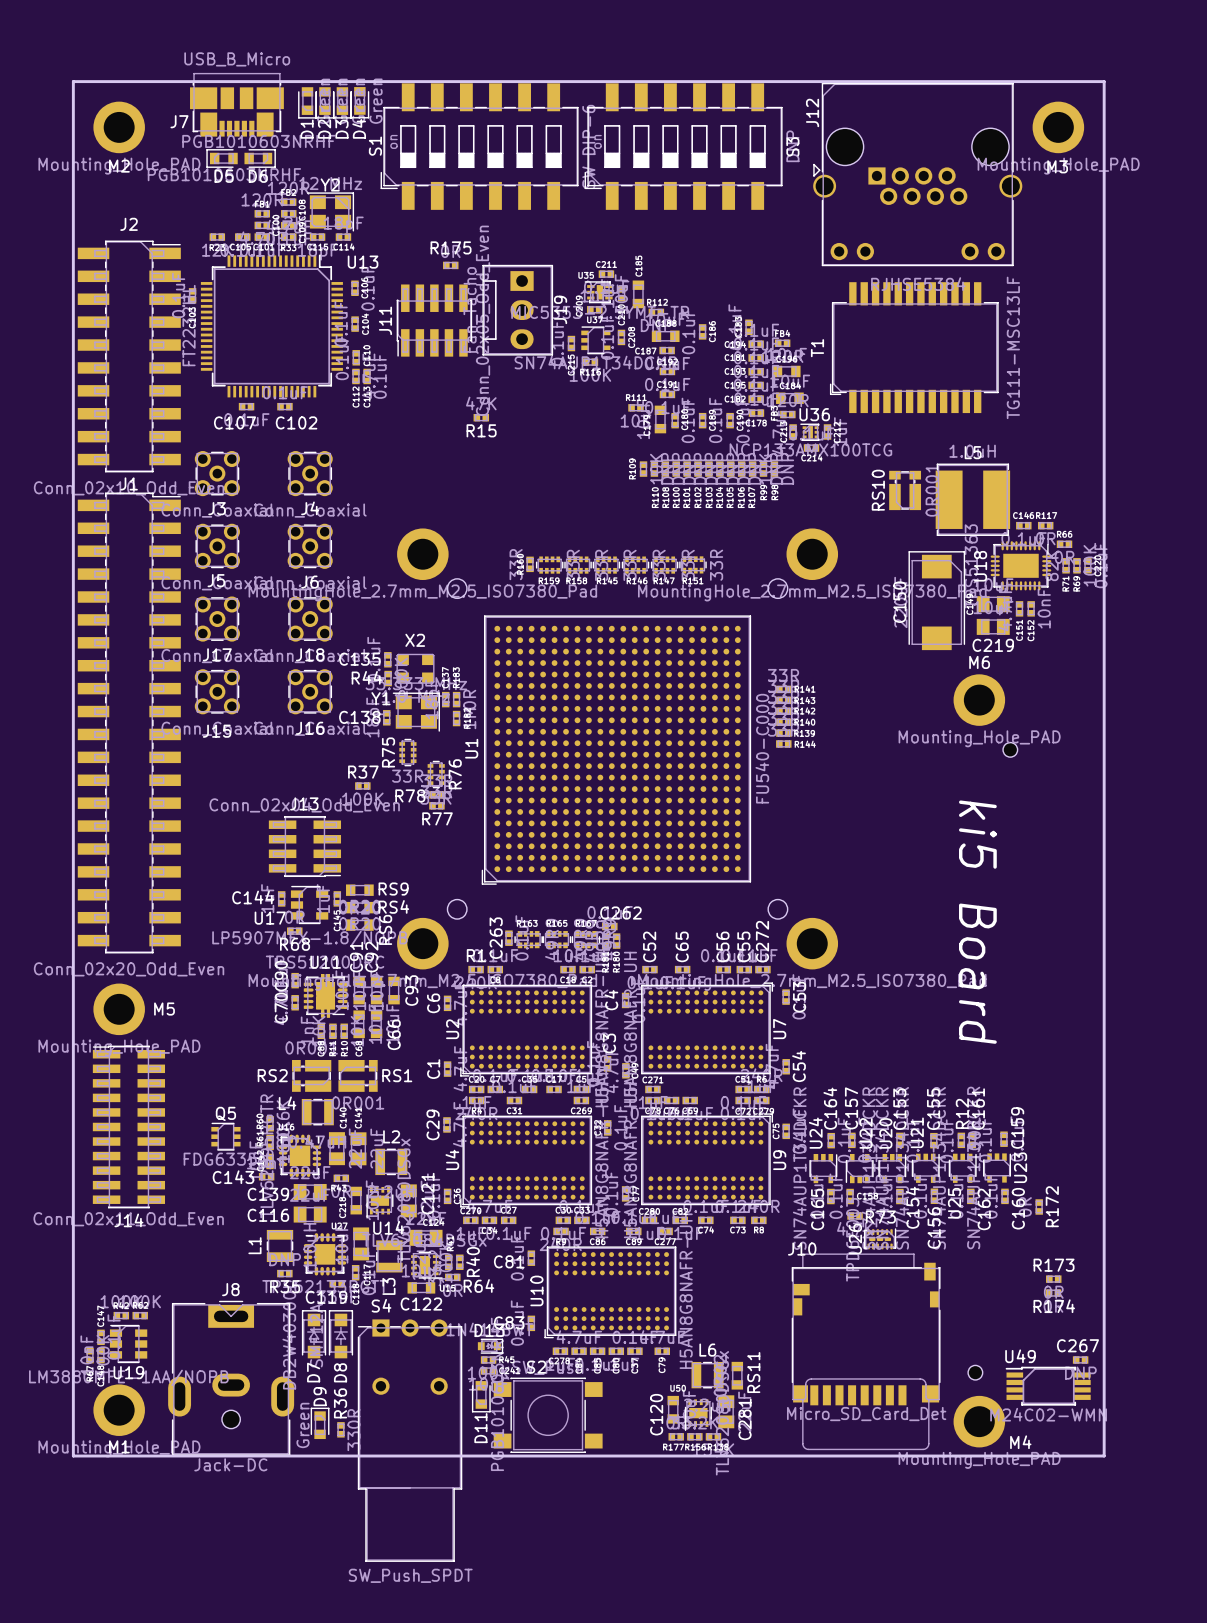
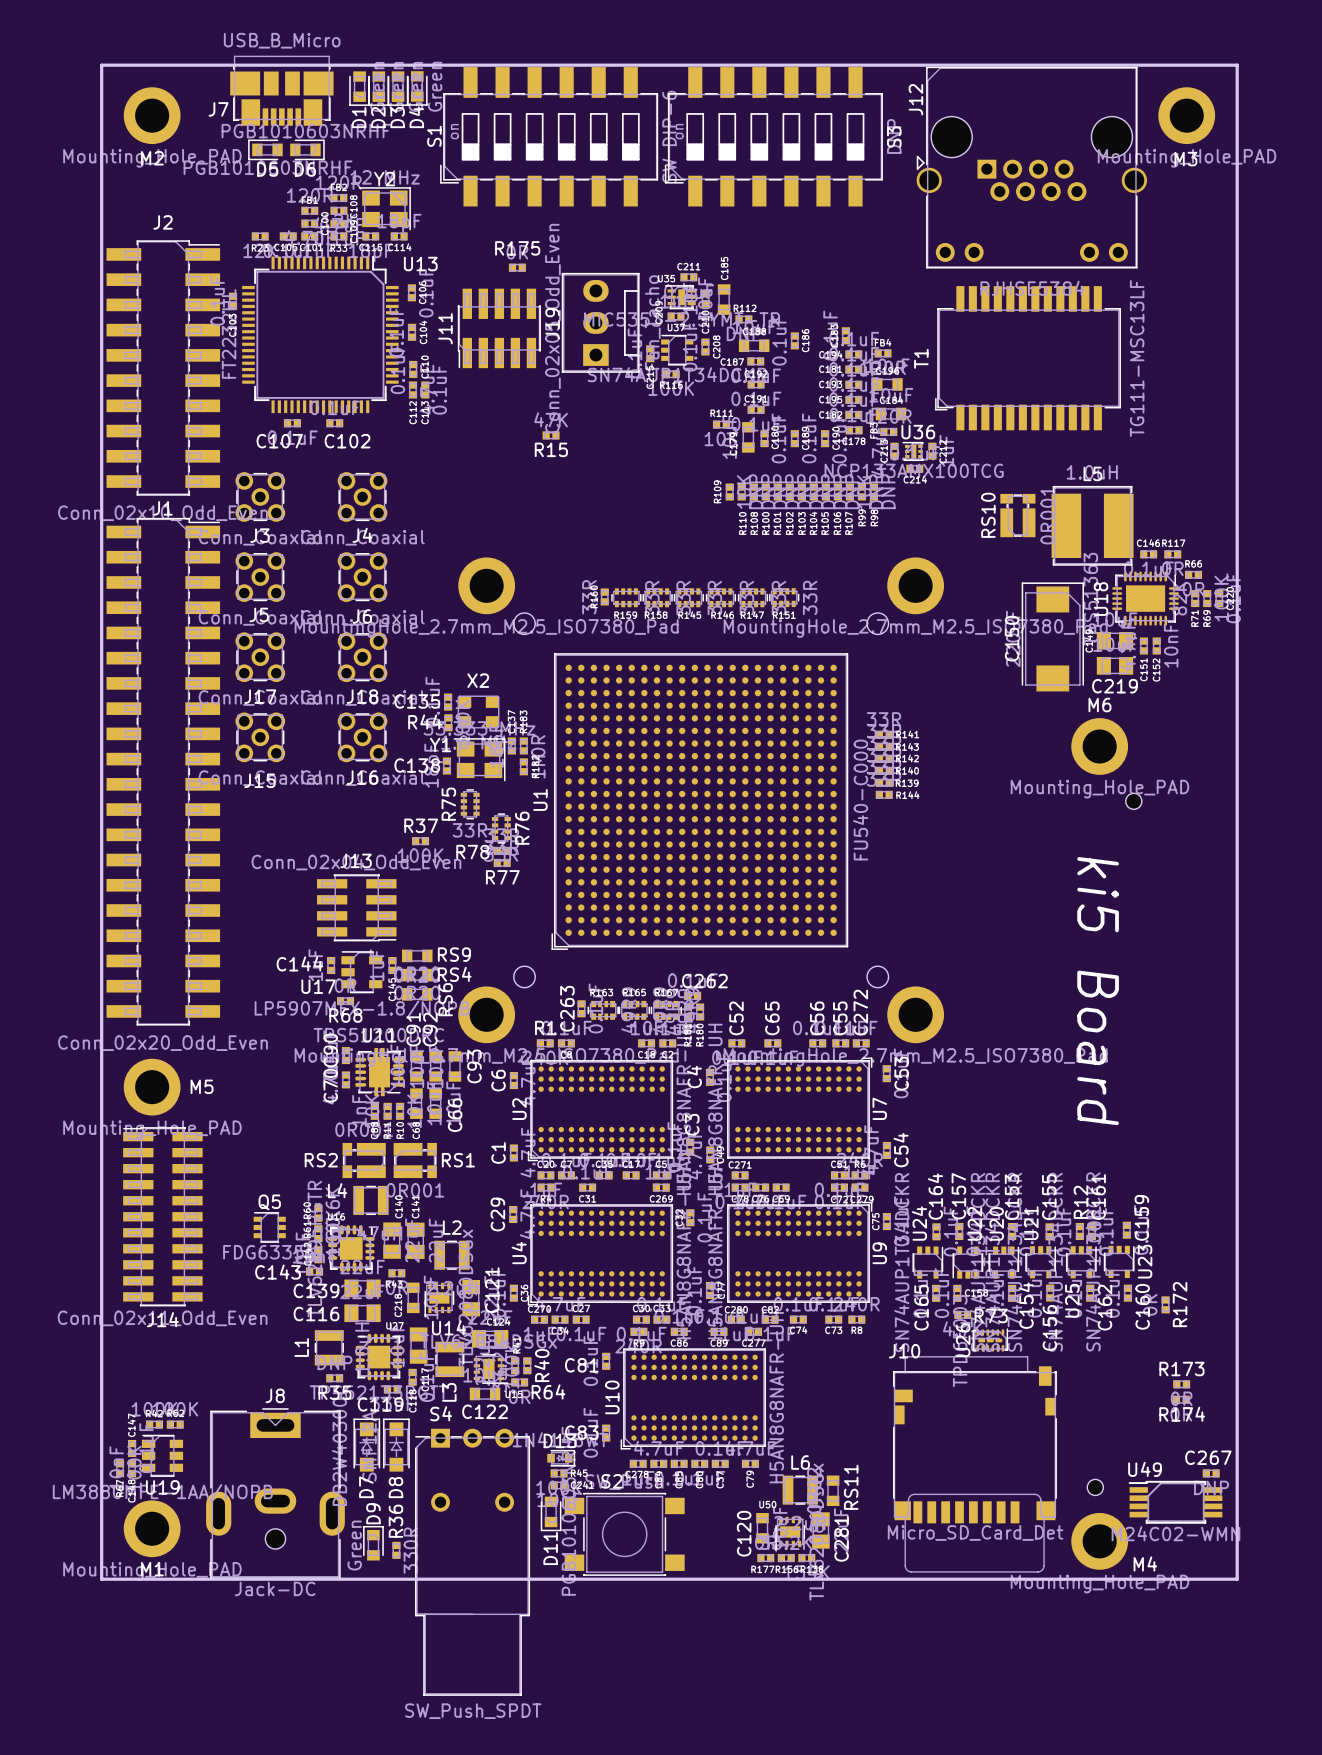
J19 rotation: 0° (517, 310) -> 180° (600, 322)

